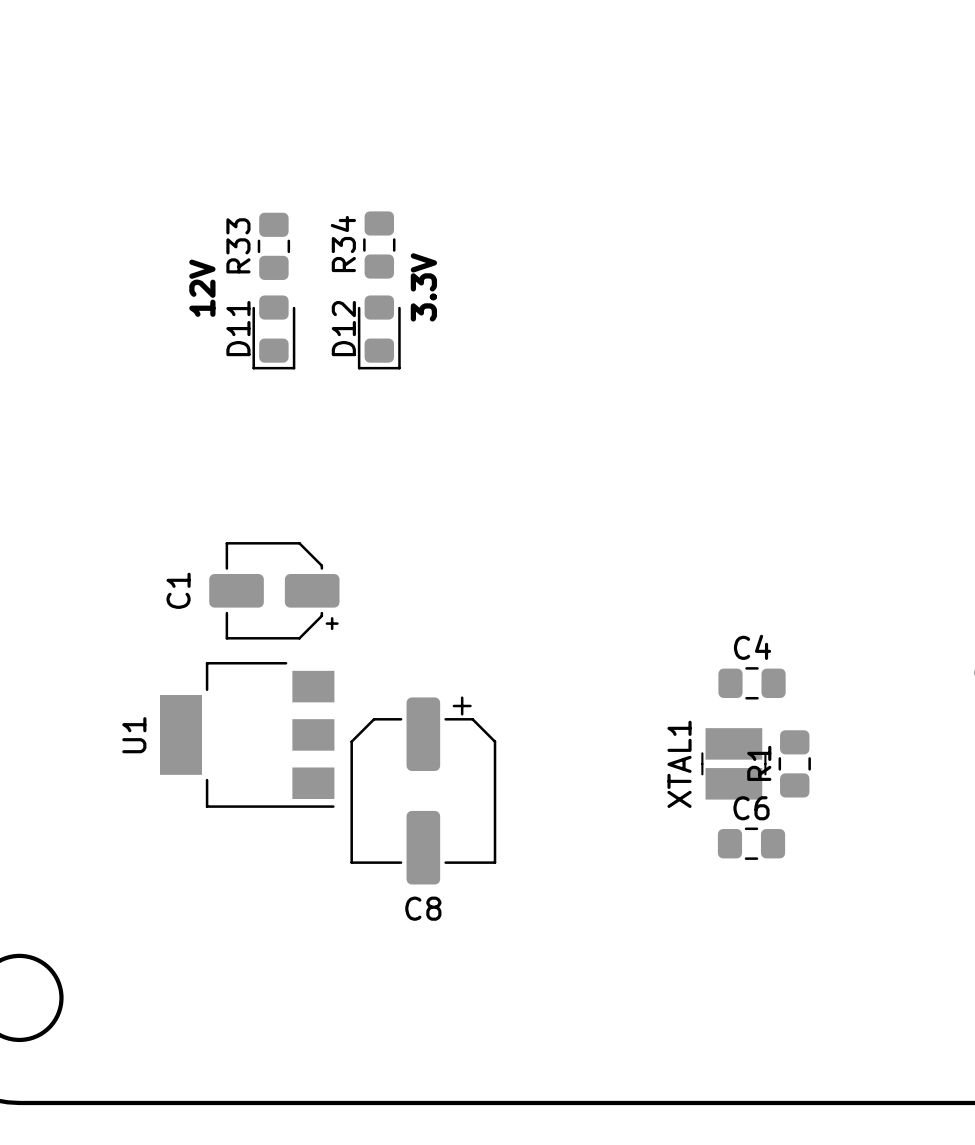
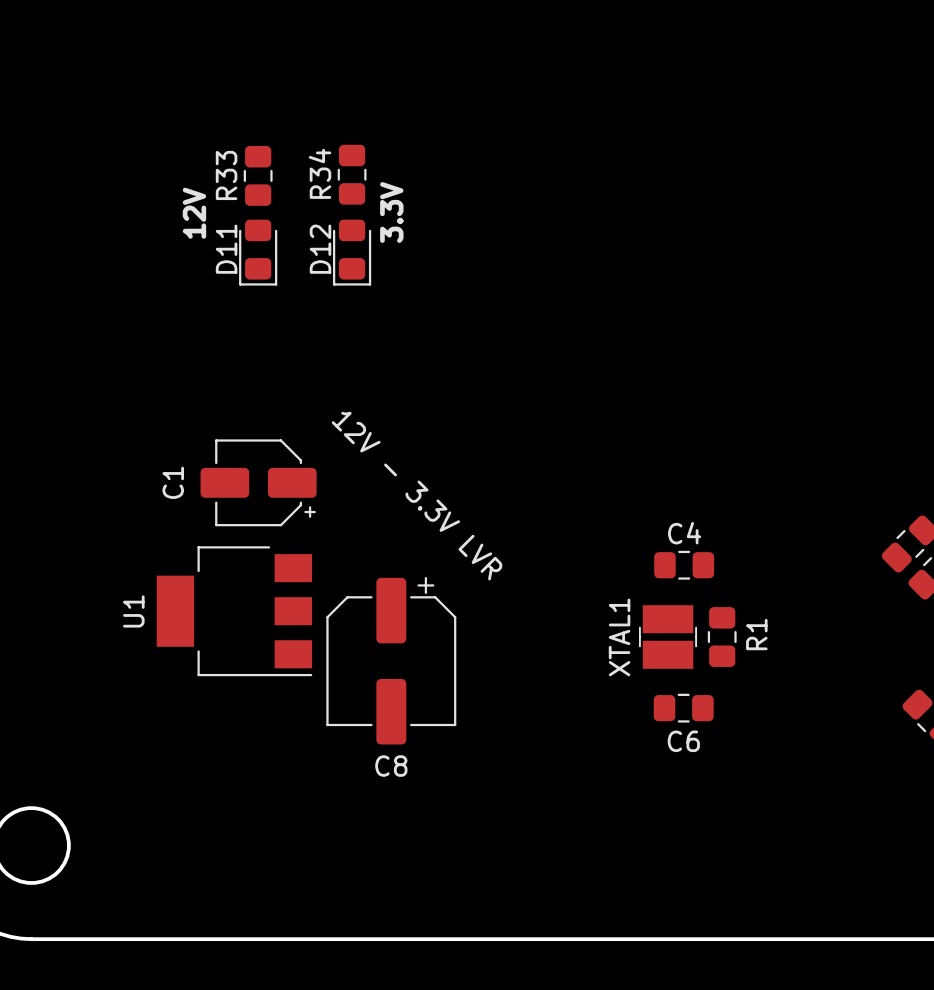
text: none -> 12V - 3.3V LVR (417, 496)
R1 name position: R1 (759, 763) -> R1 (756, 634)
C6 name position: C6 (751, 808) -> C6 (683, 741)

